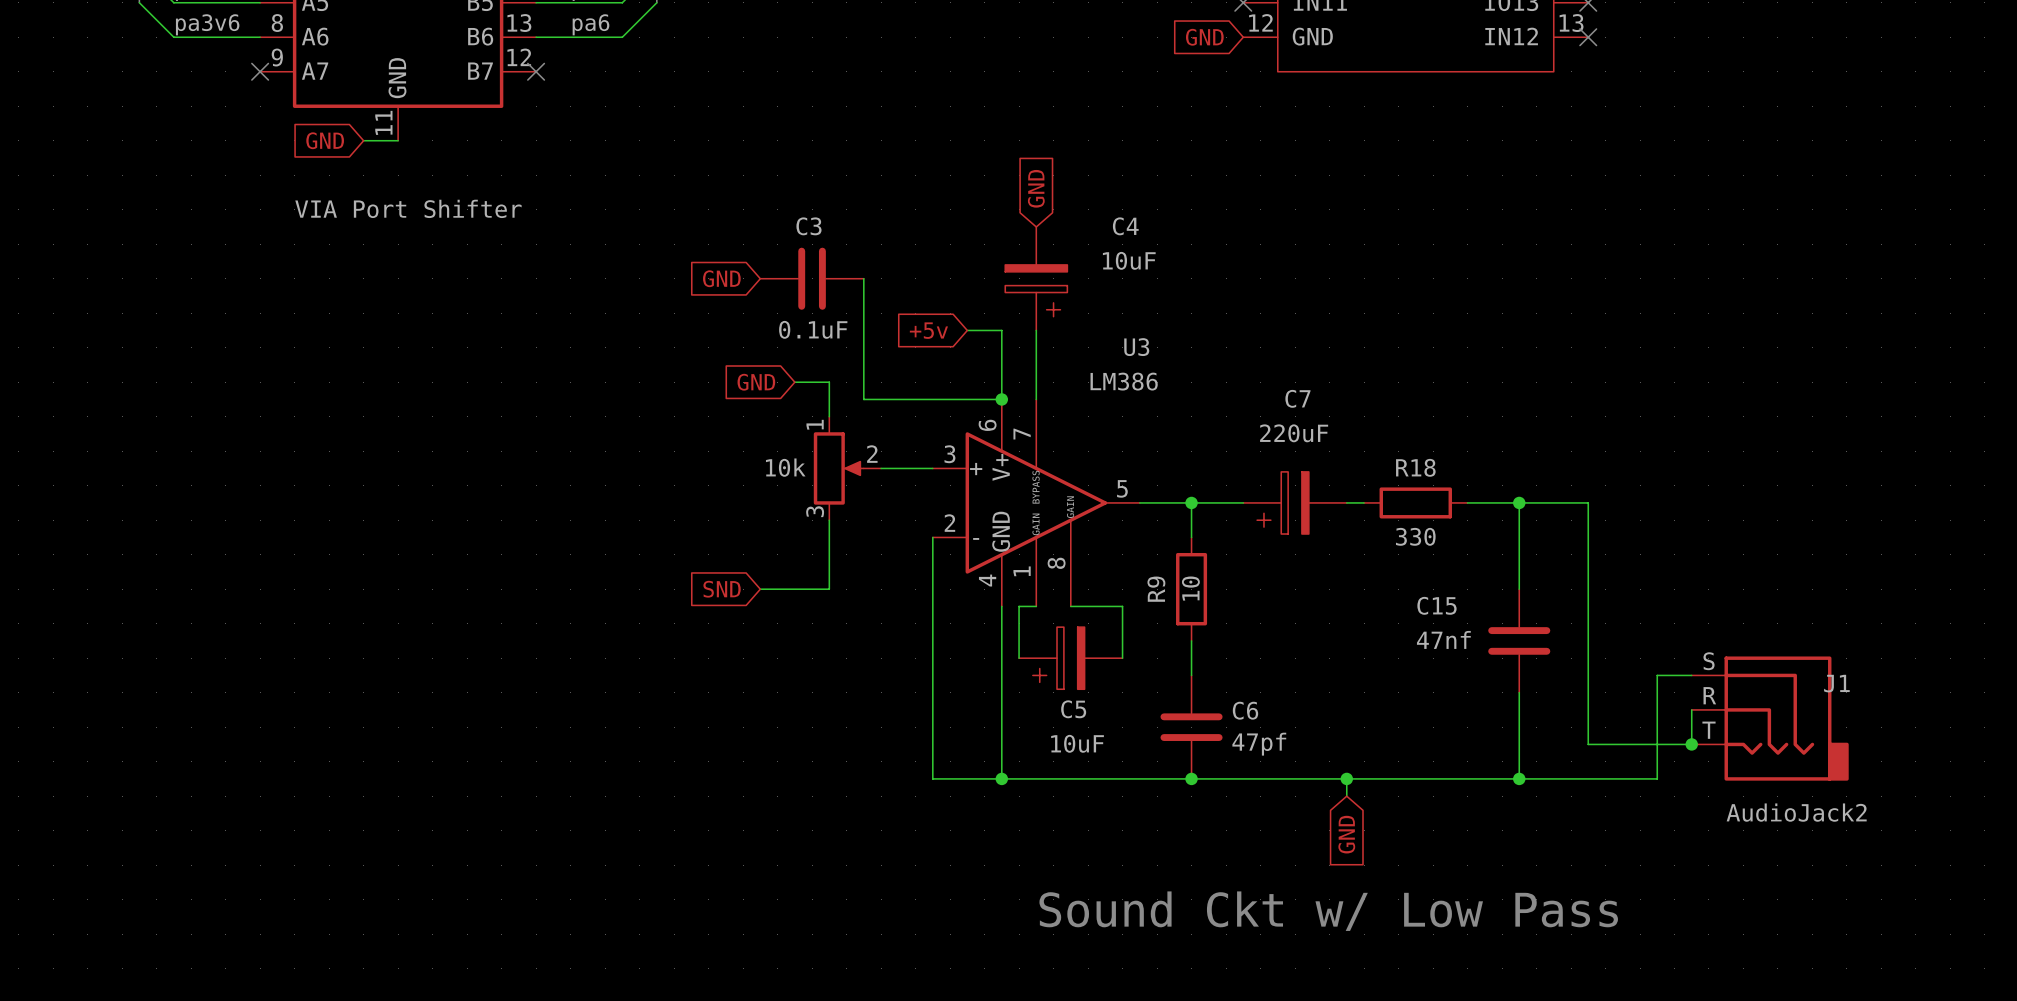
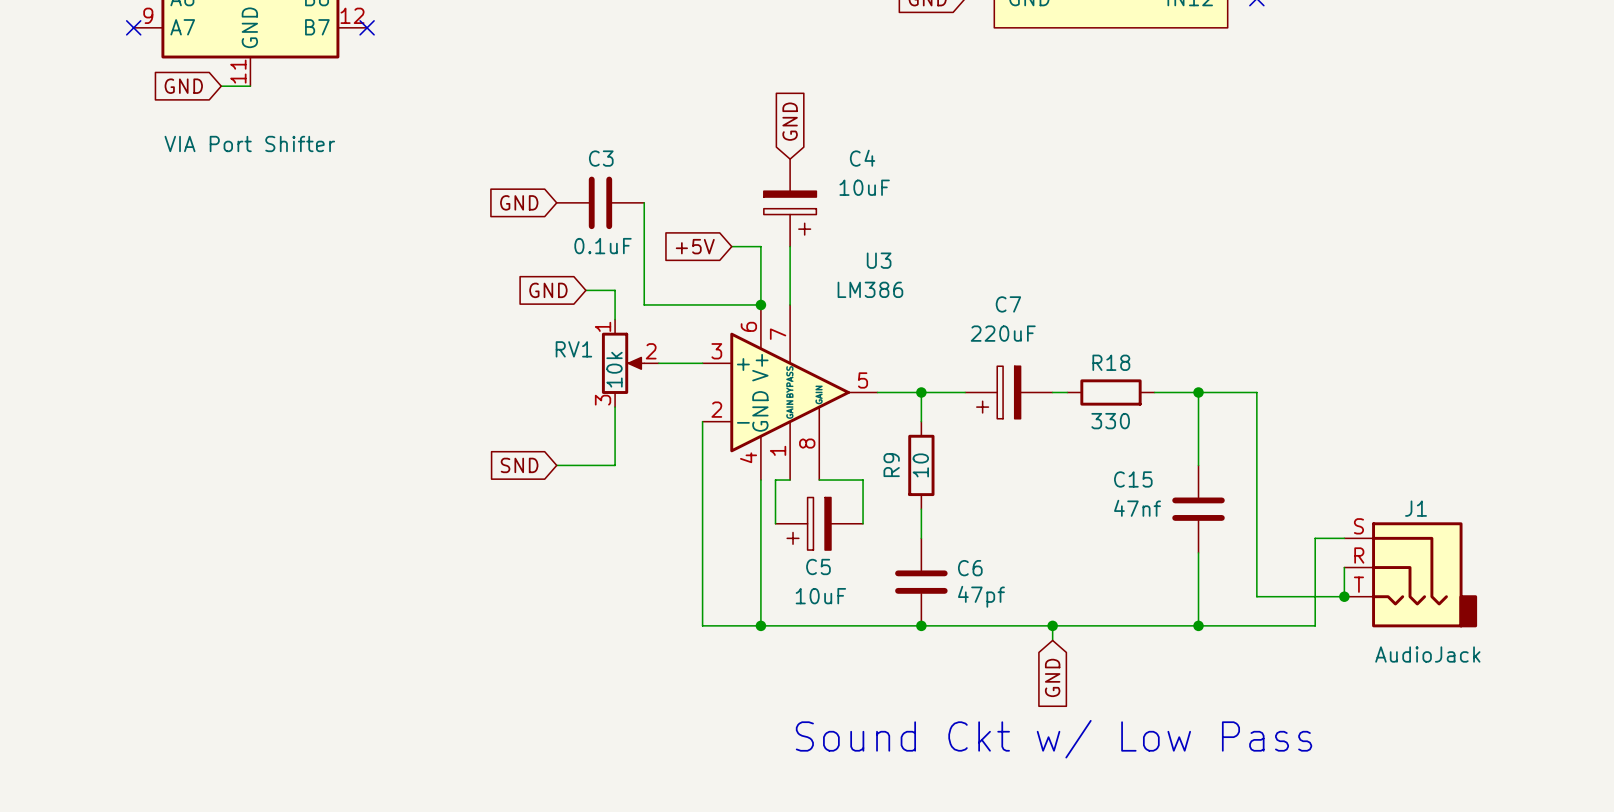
global label: +5v (928, 330) -> +5V (695, 246)
RV1 name: none -> RV1 (573, 349)
RV1 value rotation: 0° (785, 467) -> 90° counterclockwise (614, 369)
J1 name position: J1 (1836, 683) -> J1 (1416, 508)
J1 value: AudioJack2 (1796, 812) -> AudioJack (1427, 654)

